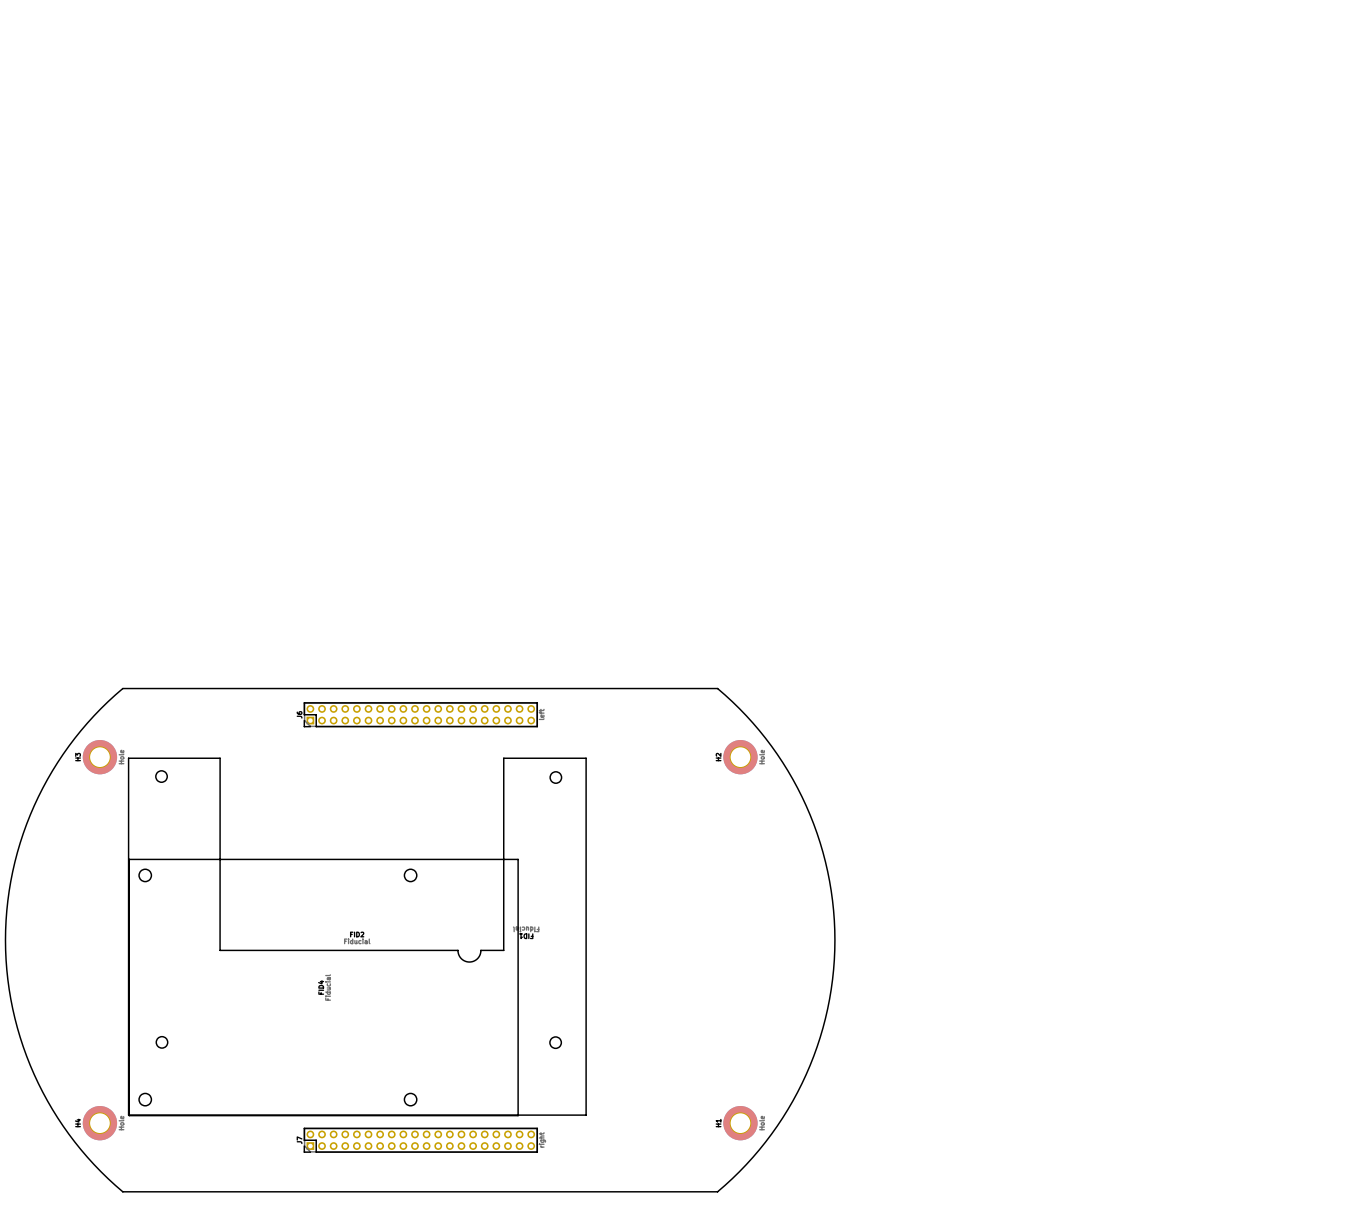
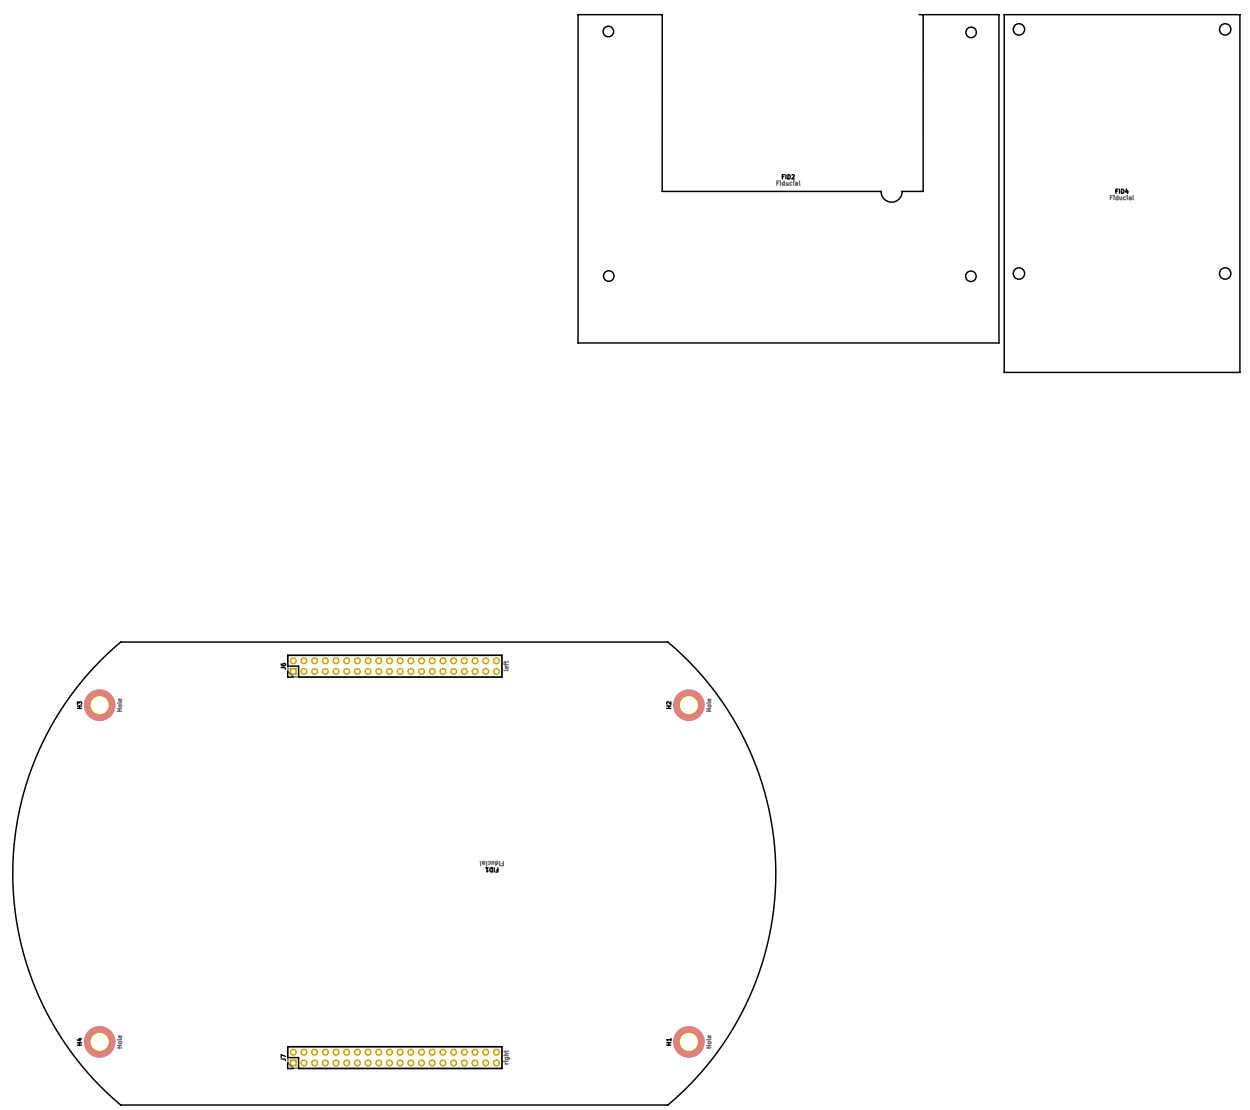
part footprint: [128, 757, 587, 1116] -> [577, 14, 1000, 344]
part rotation: 0° (323, 987) -> 90° clockwise (1122, 193)
part position: (323, 987) -> (1122, 193)

